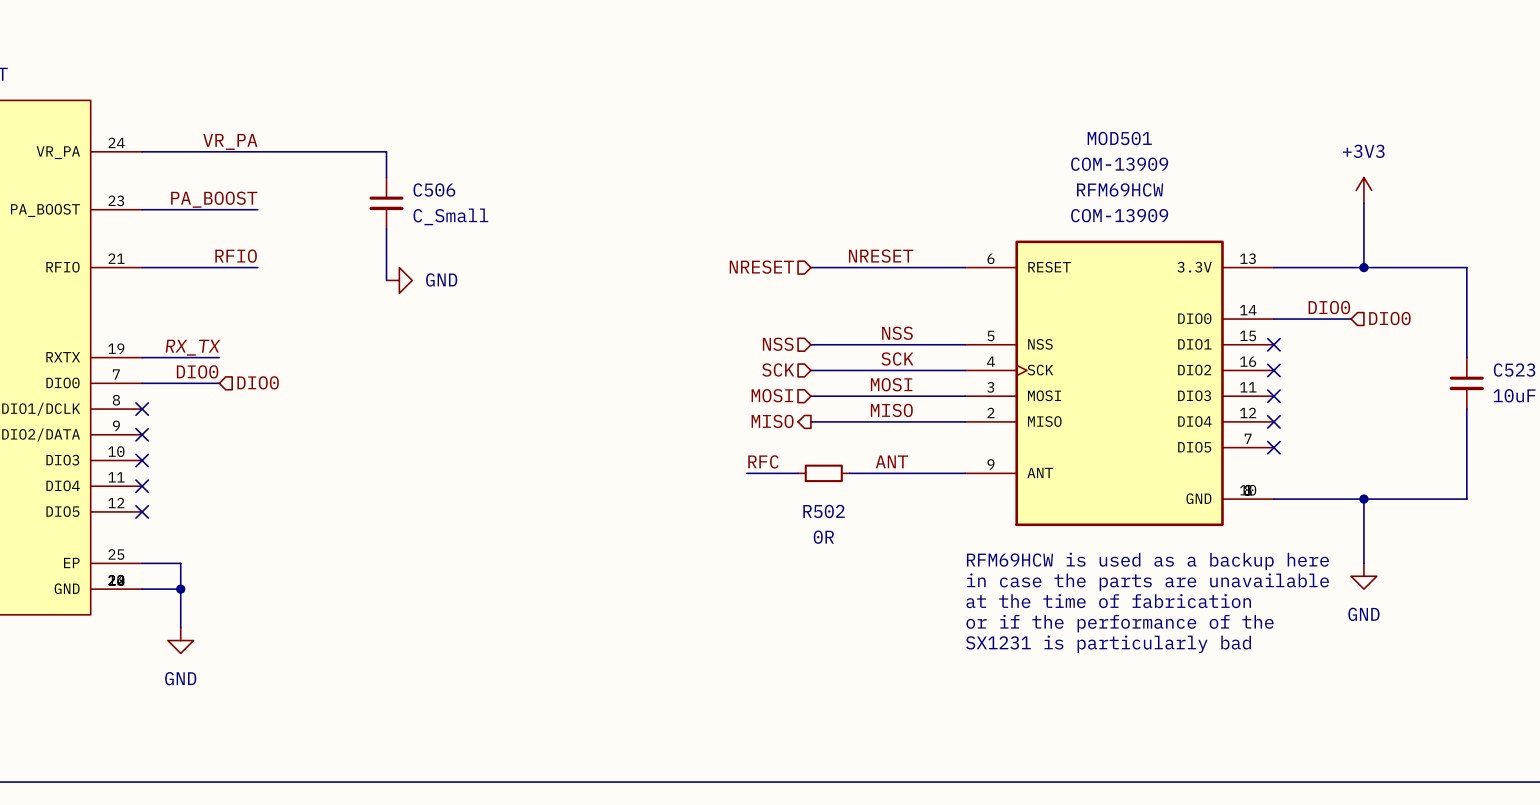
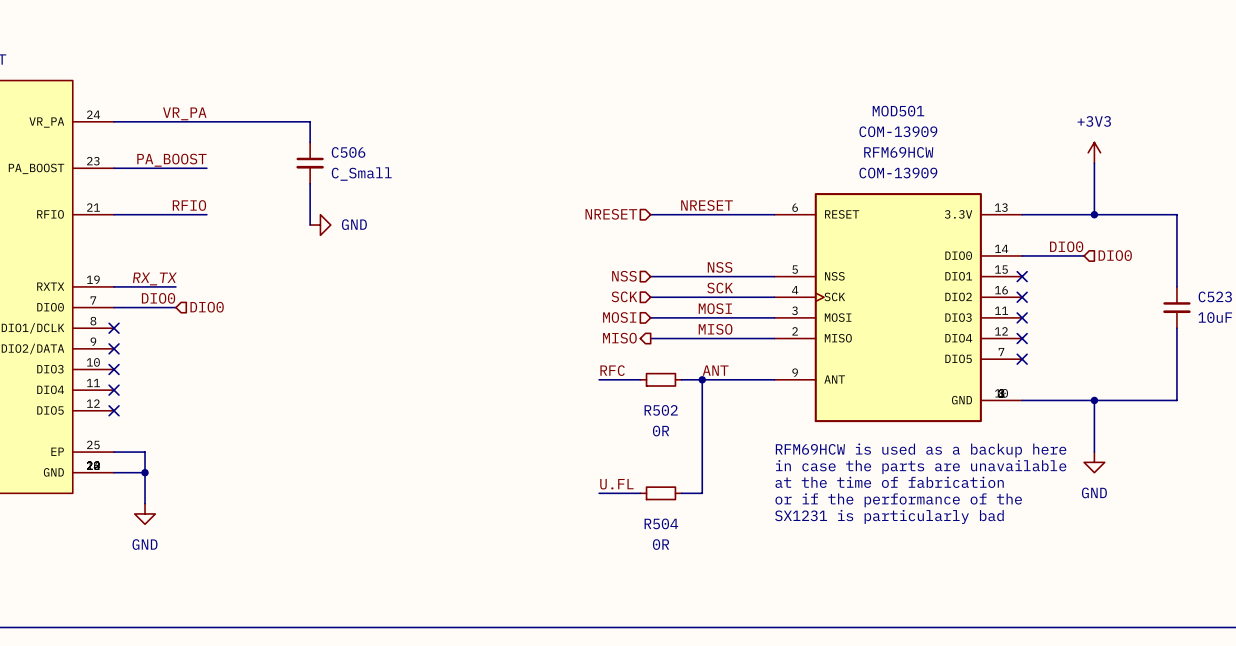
wire: none -> (702, 379) (702, 493) (681, 493)
junction: none -> (702, 379)
label: none -> U.FL (616, 484)
wire: none -> (599, 493) (640, 493)
R504: none -> 0R (660, 493)

